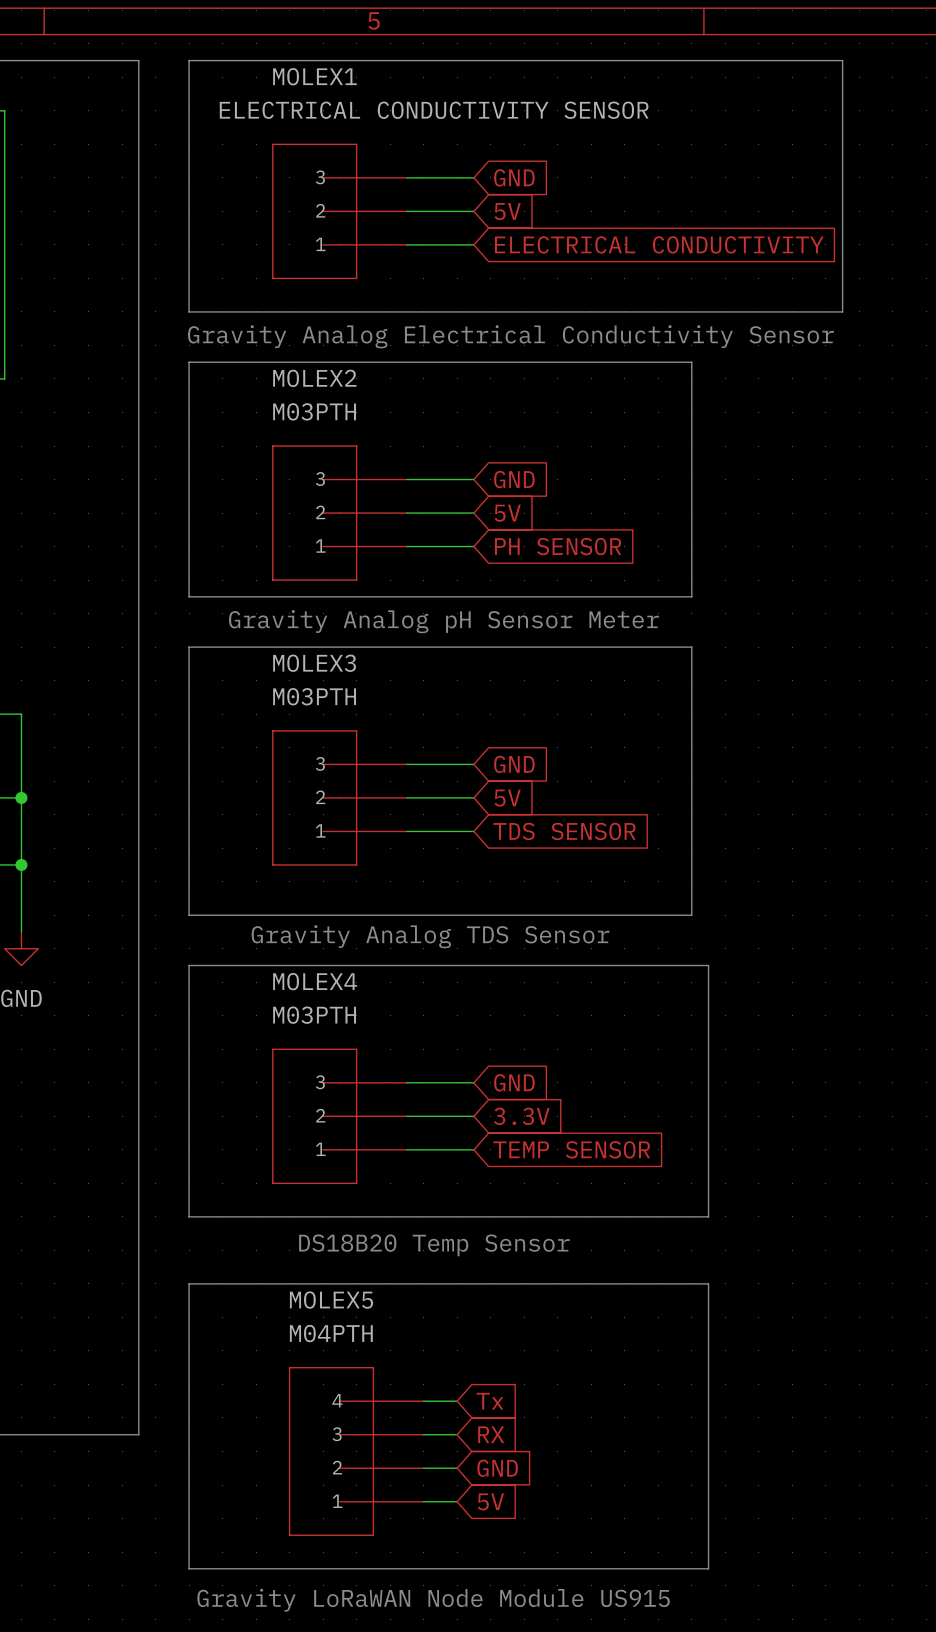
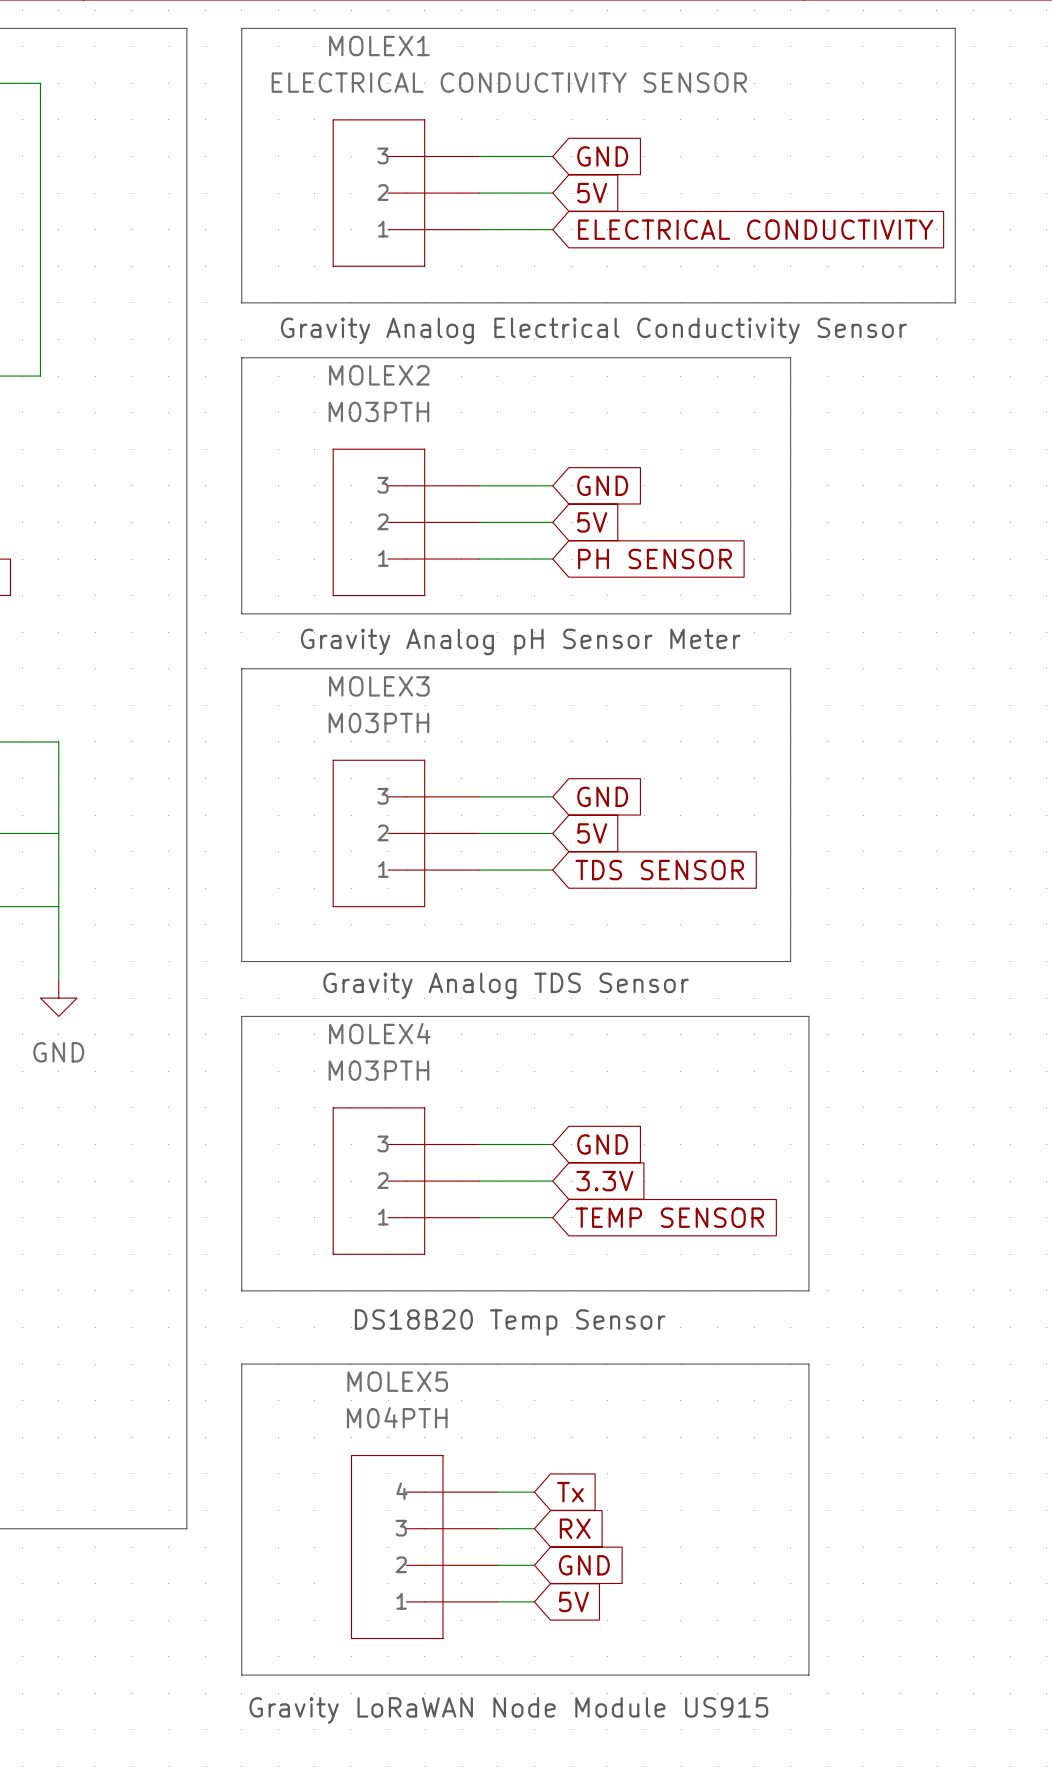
junction: (21, 797) -> none
junction: (21, 864) -> none

